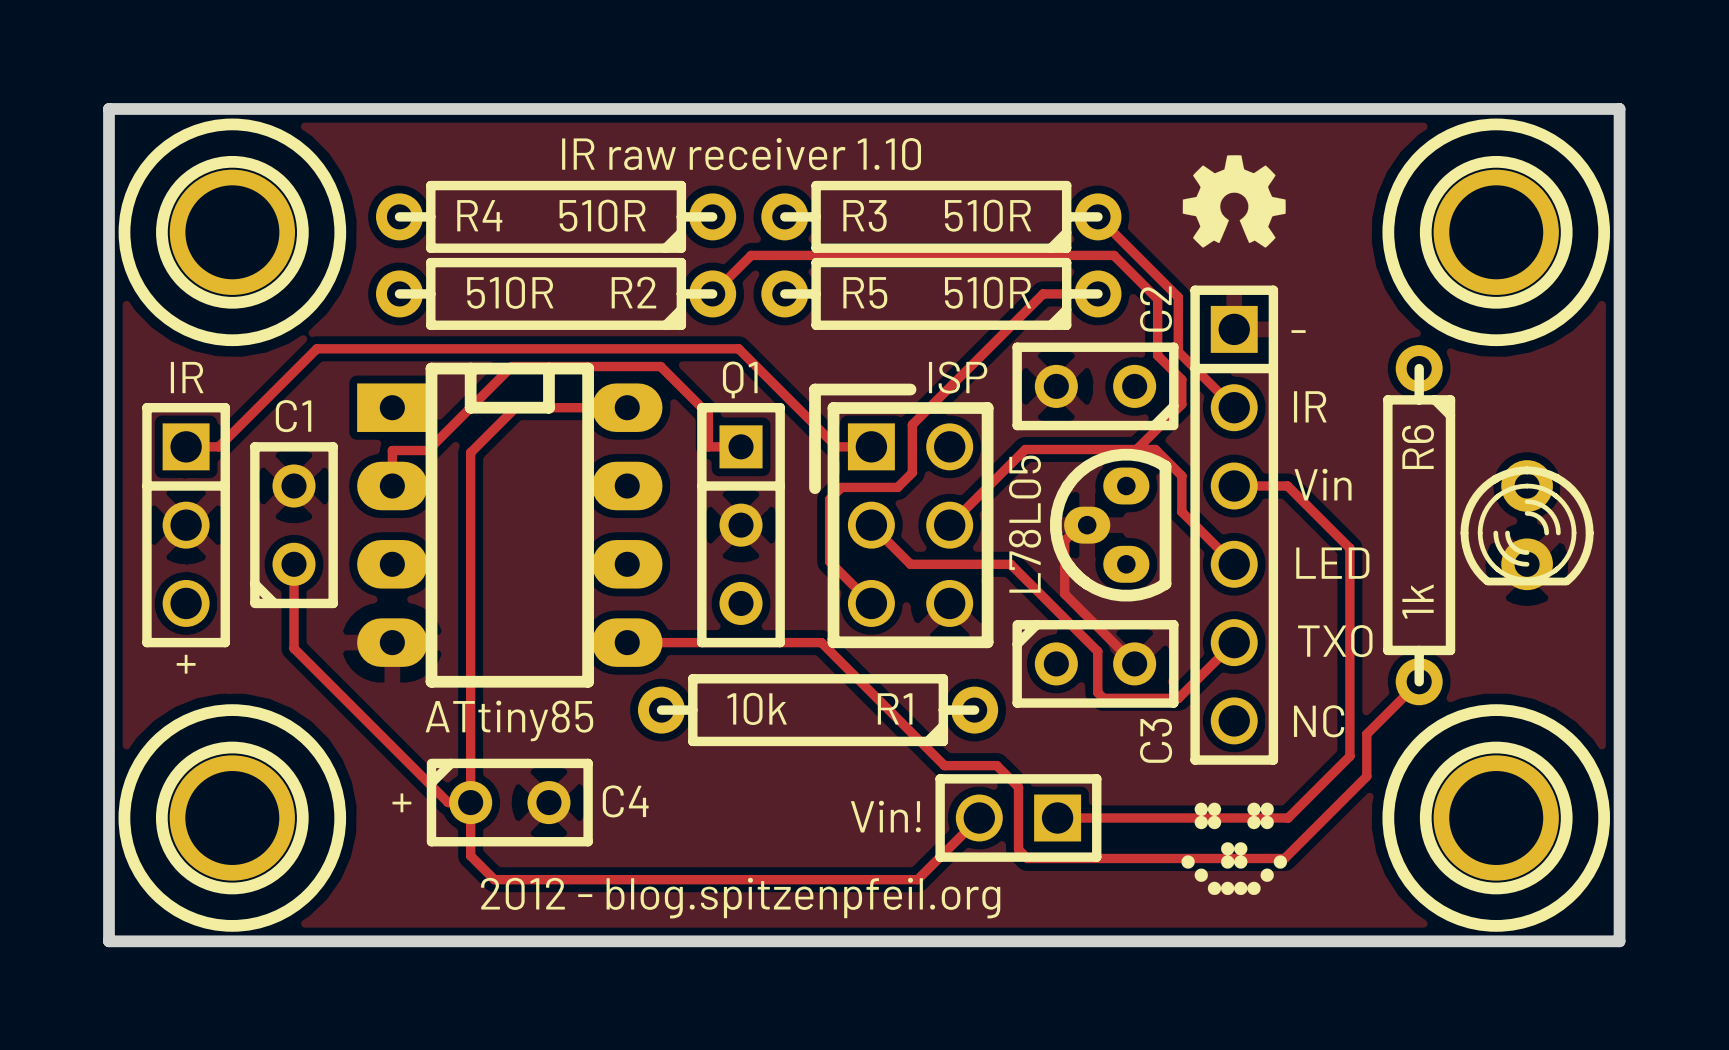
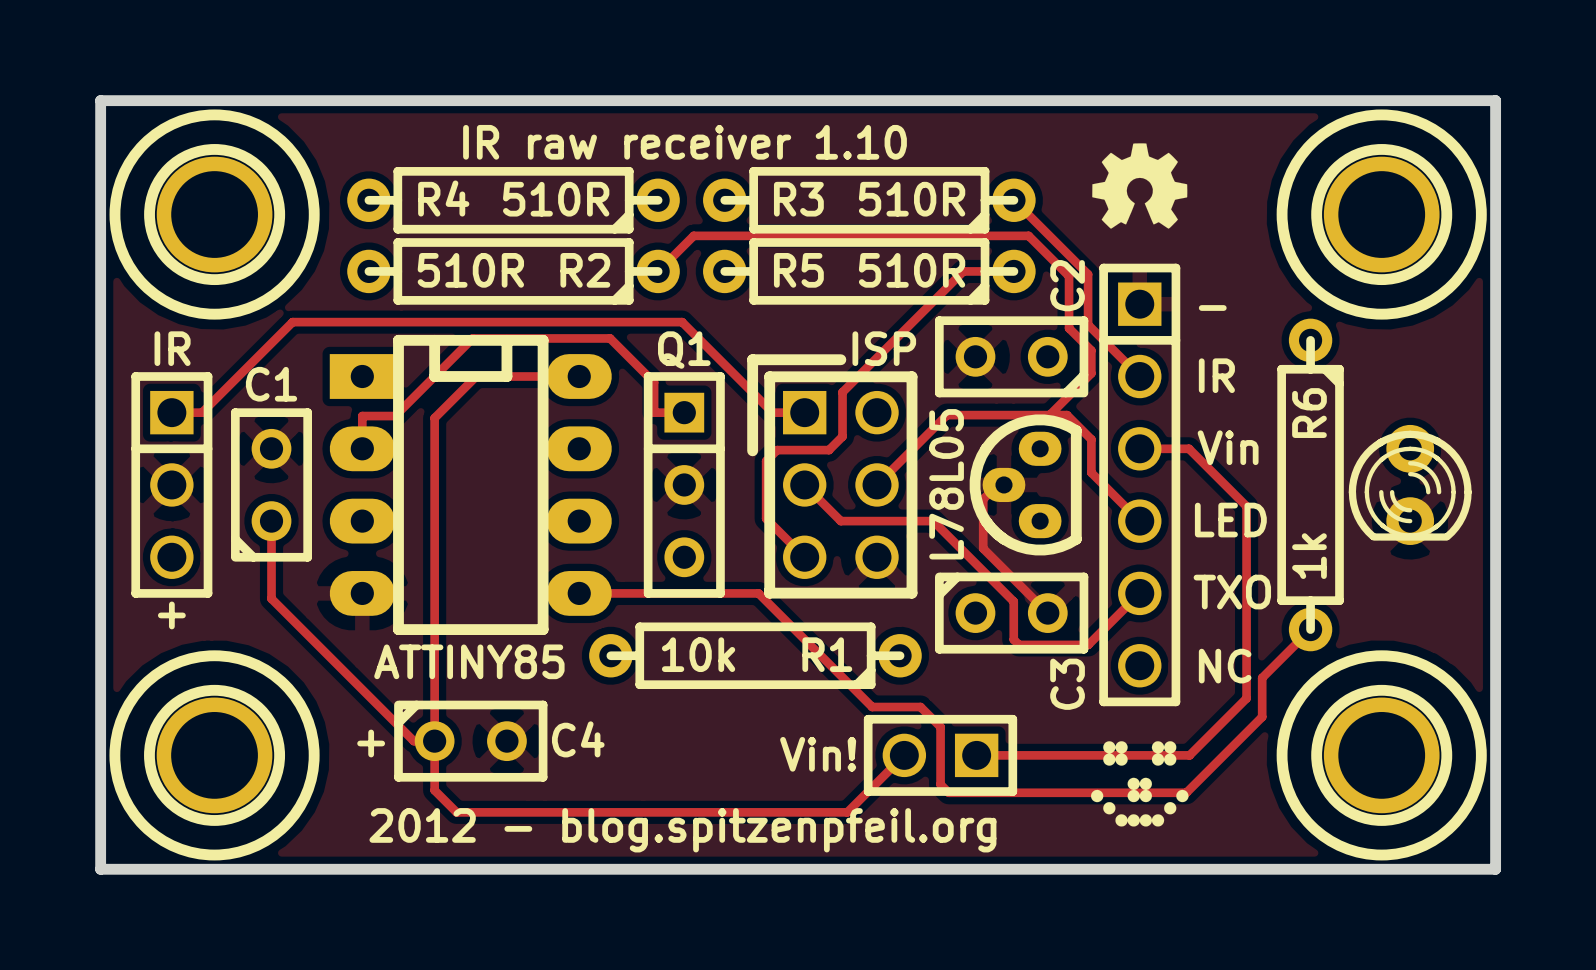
part value: ATtiny85 (509, 720) -> ATTINY85 (469, 661)

